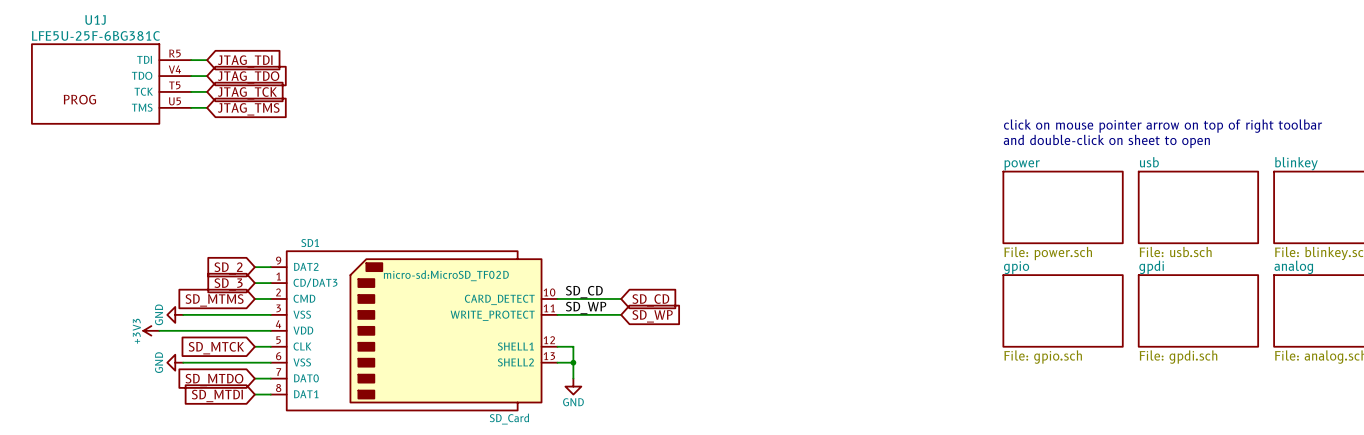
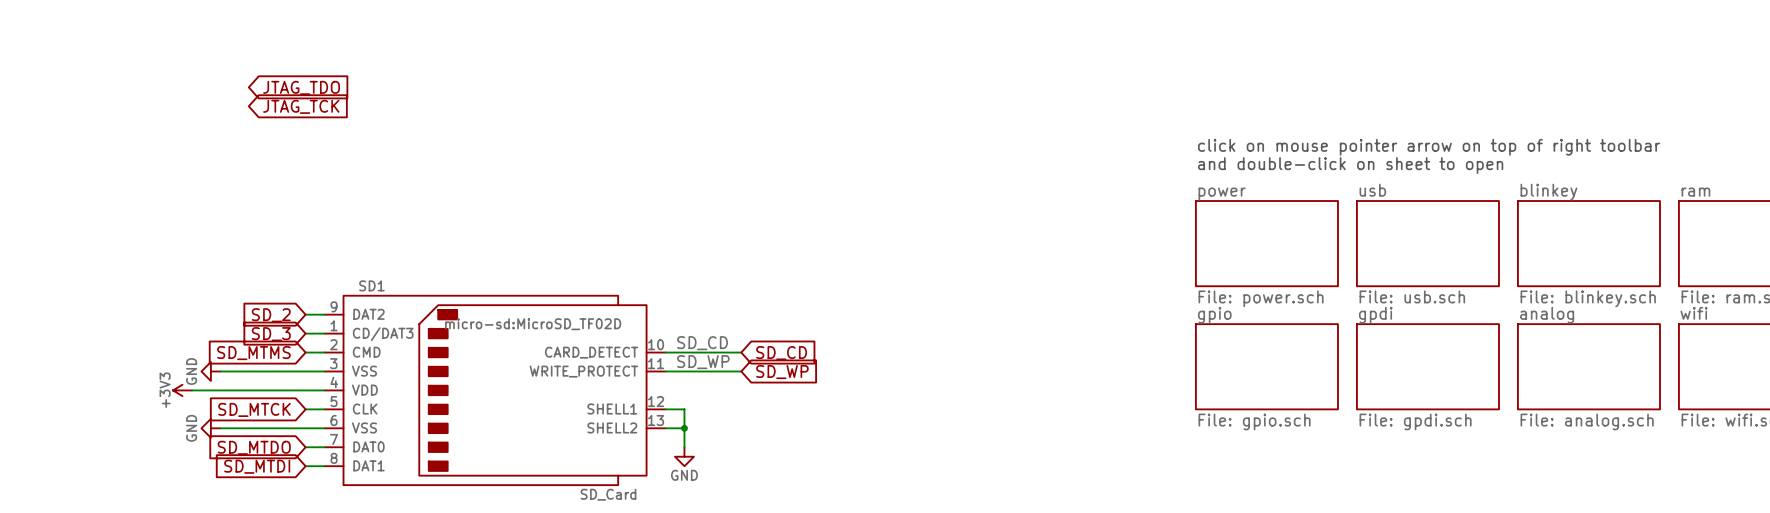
wire: (191, 60) (207, 60) -> none
global label: JTAG_TDI (245, 61) -> none
wire: (191, 76) (207, 76) -> none
U1J: LFE5U-25F-6BG381C (111, 84) -> none
wire: (191, 91) (207, 91) -> none
wire: (191, 107) (207, 107) -> none
global label: JTAG_TMS (248, 109) -> none

